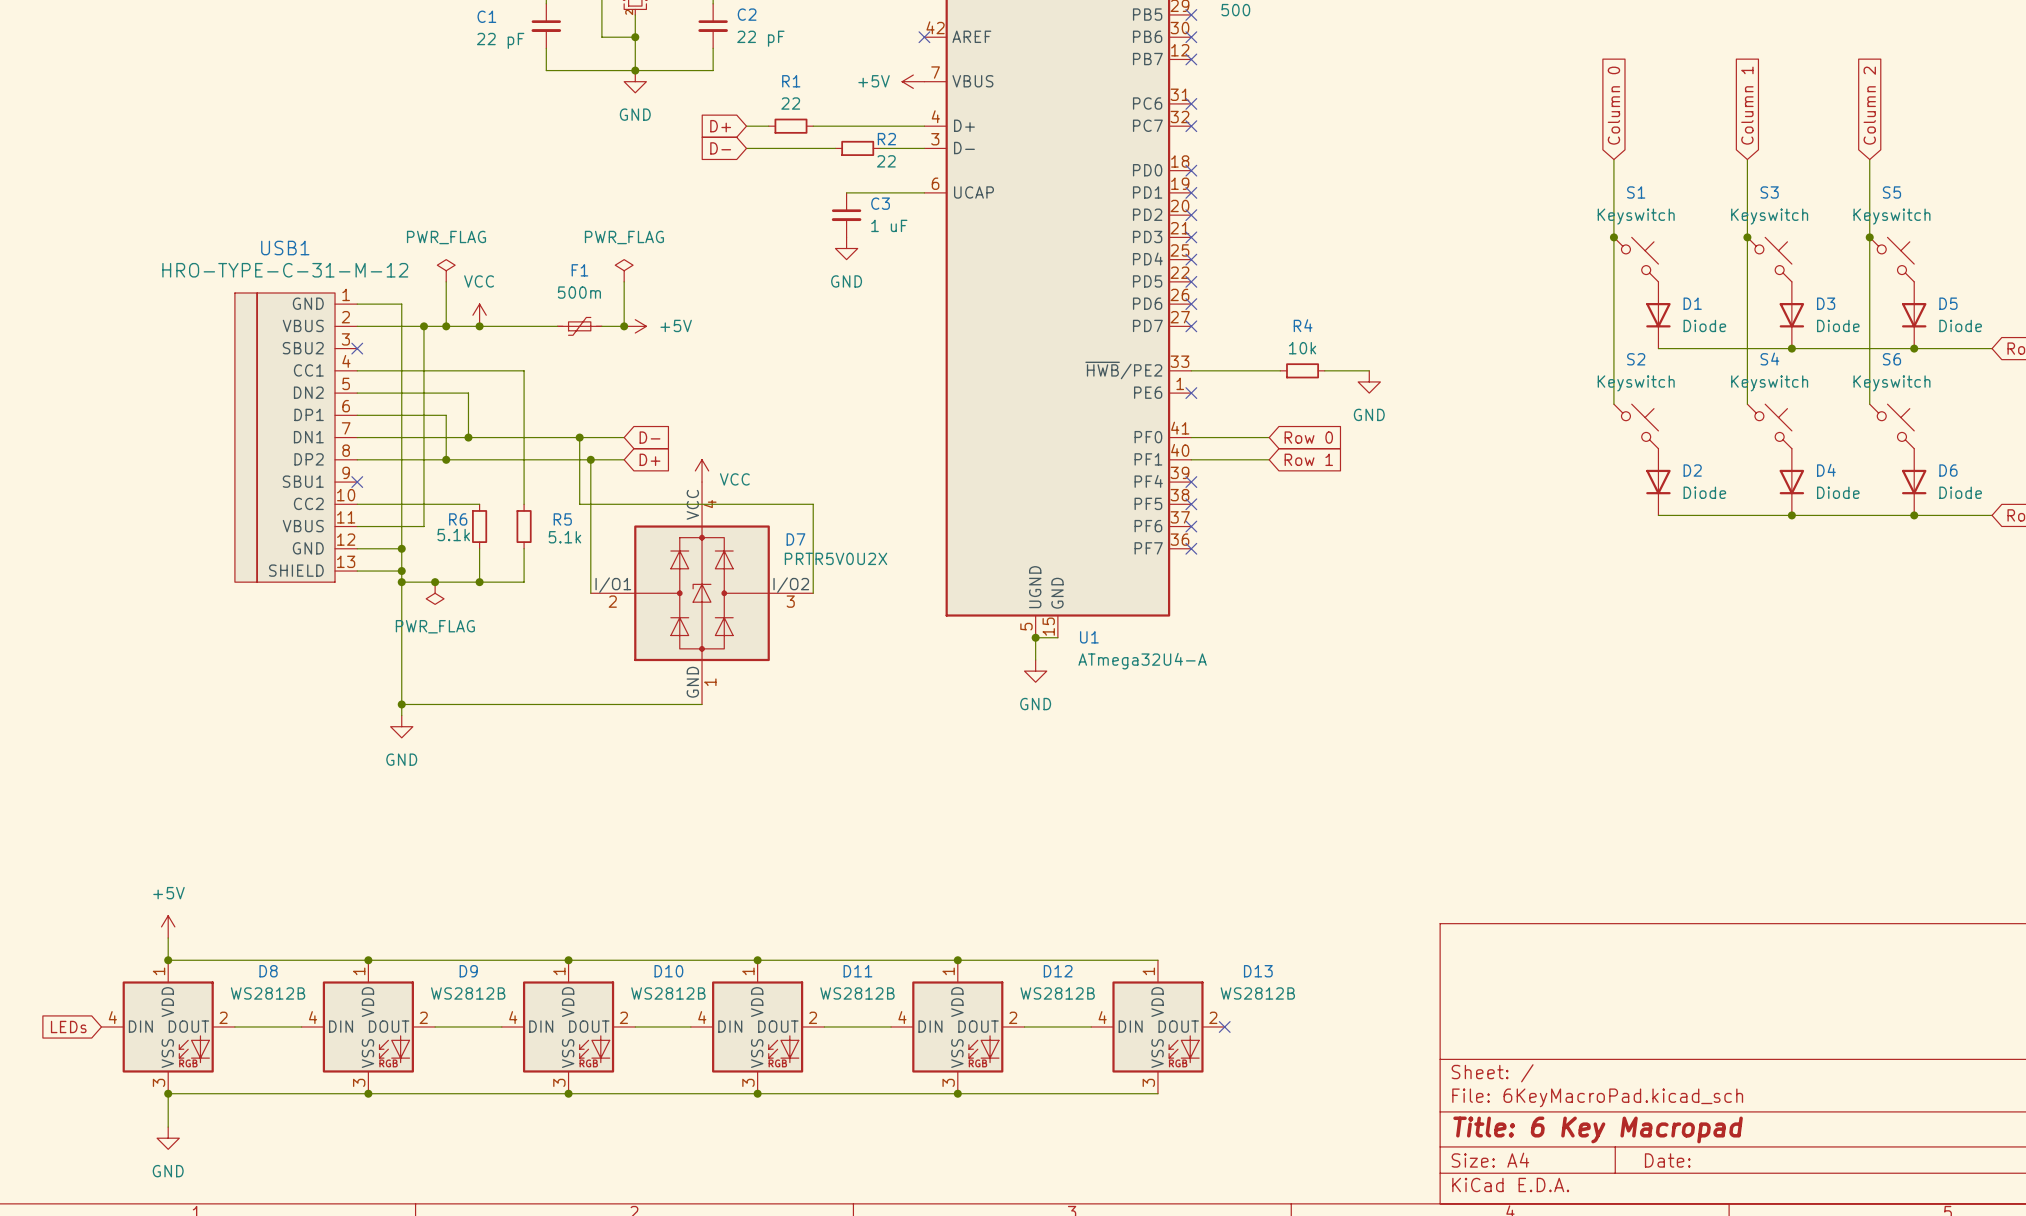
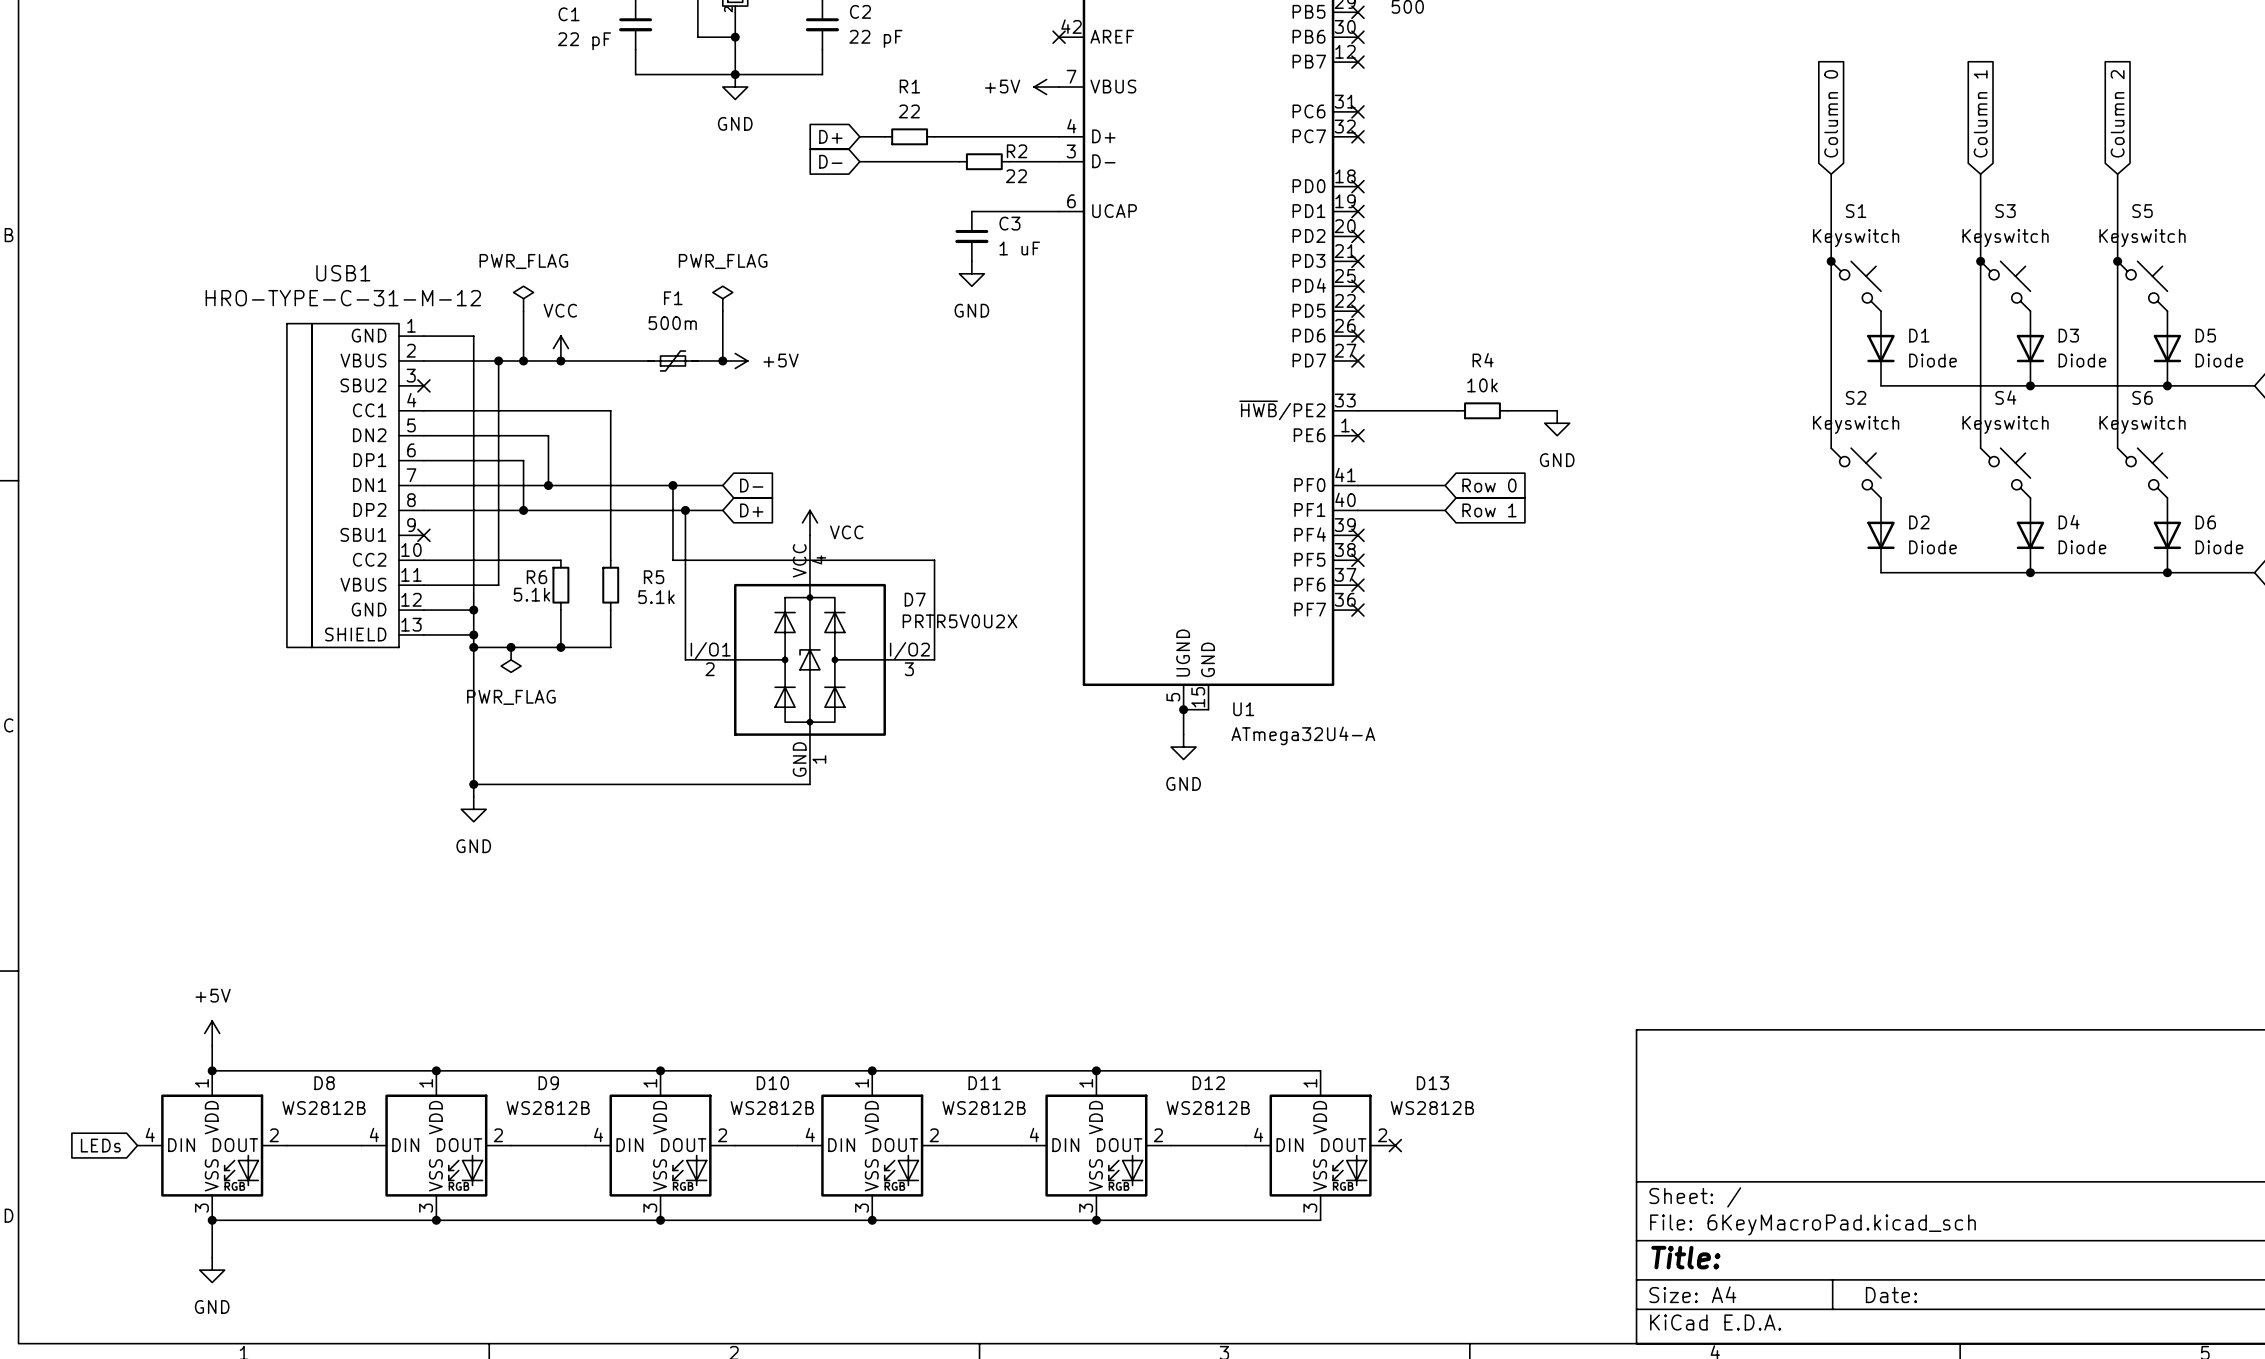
title block: Title: 6 Key Macropad (1598, 1129) -> Title: (1685, 1257)

